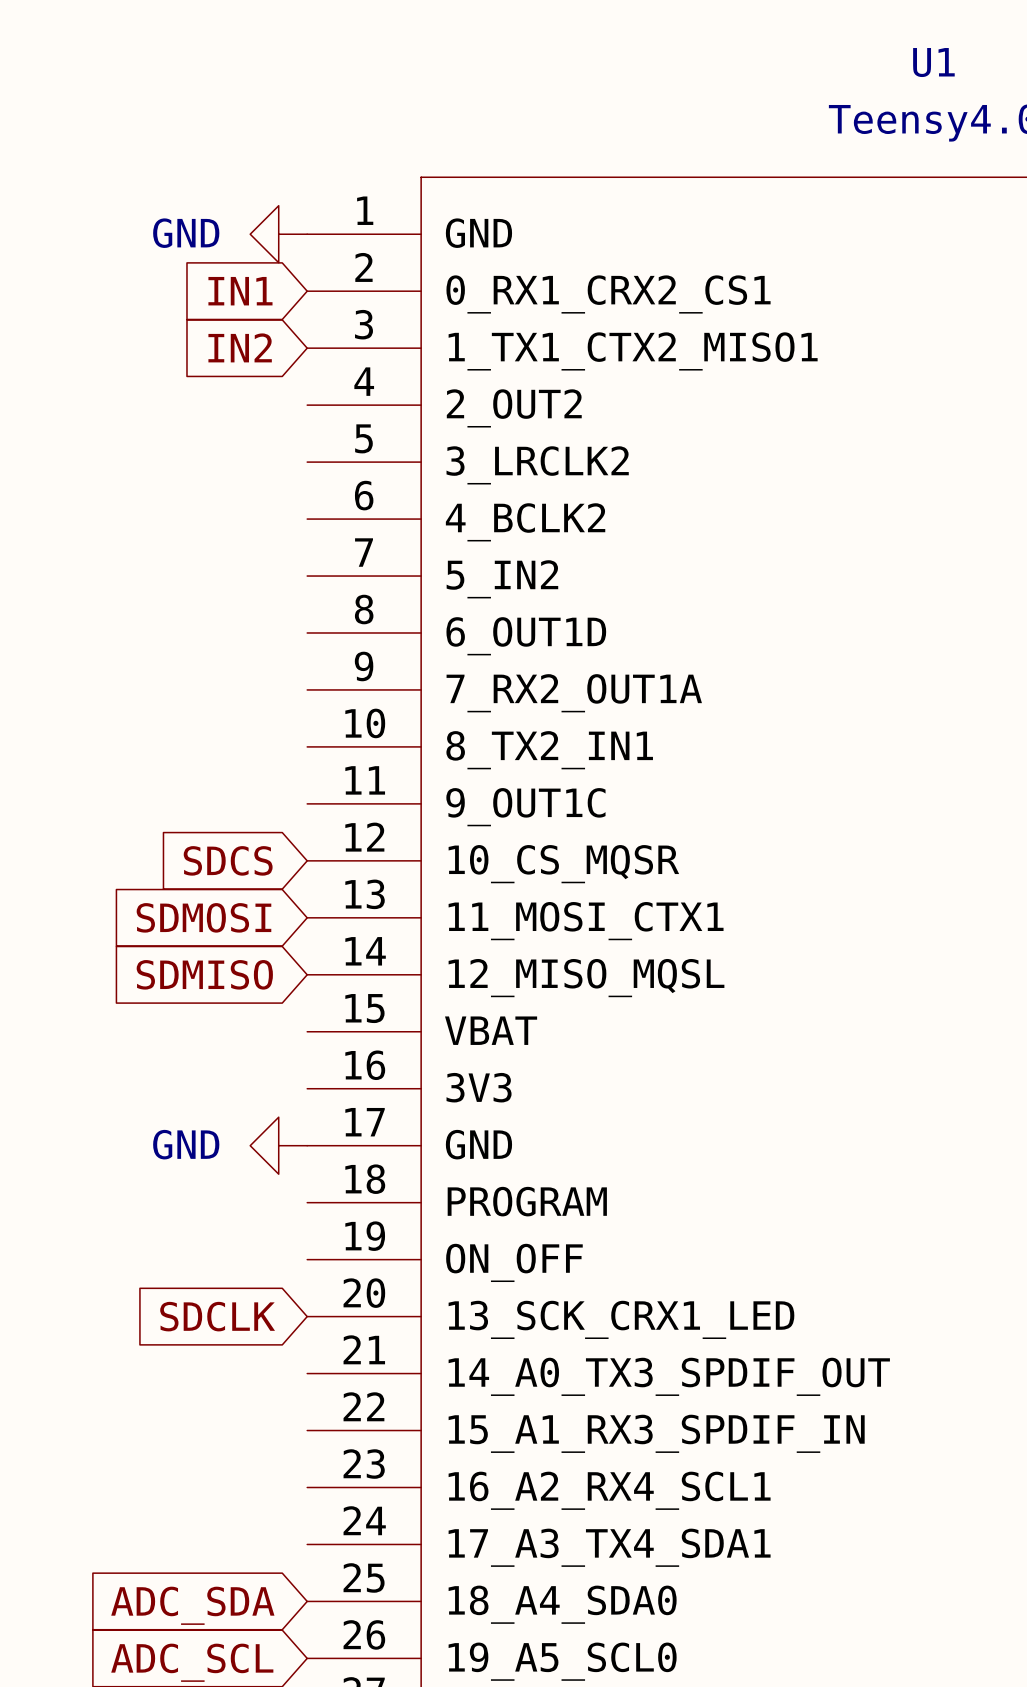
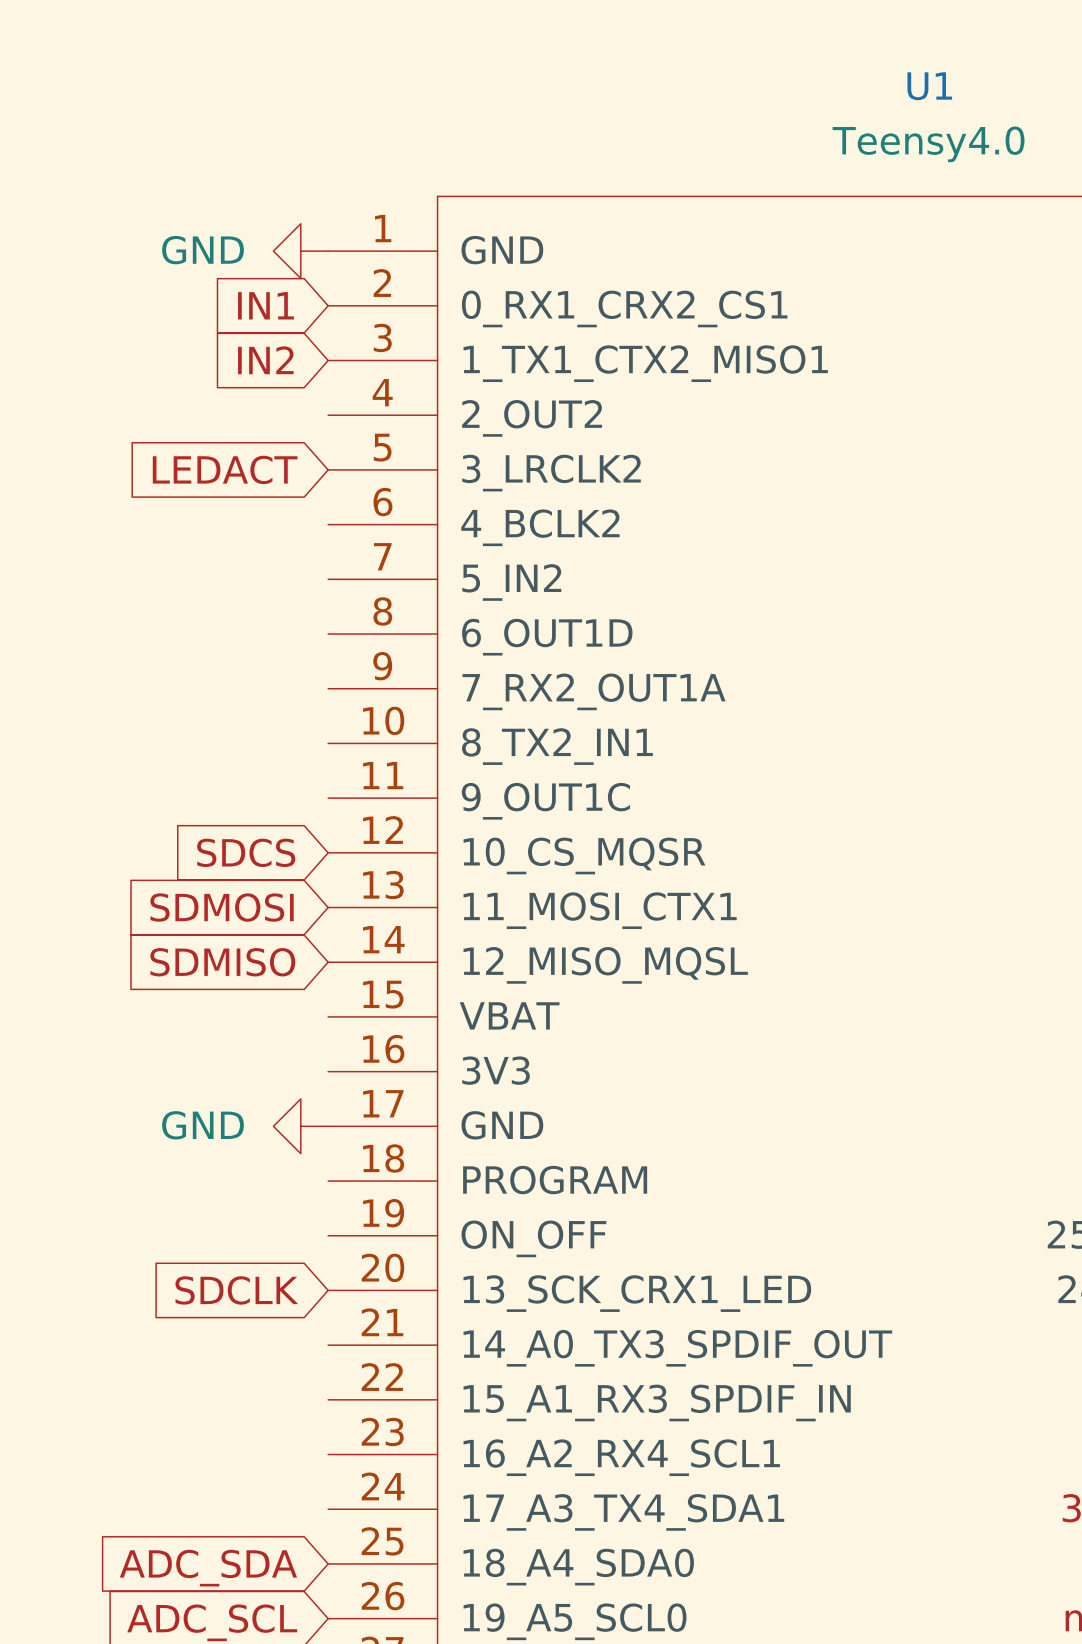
global label: none -> LEDACT (225, 469)

